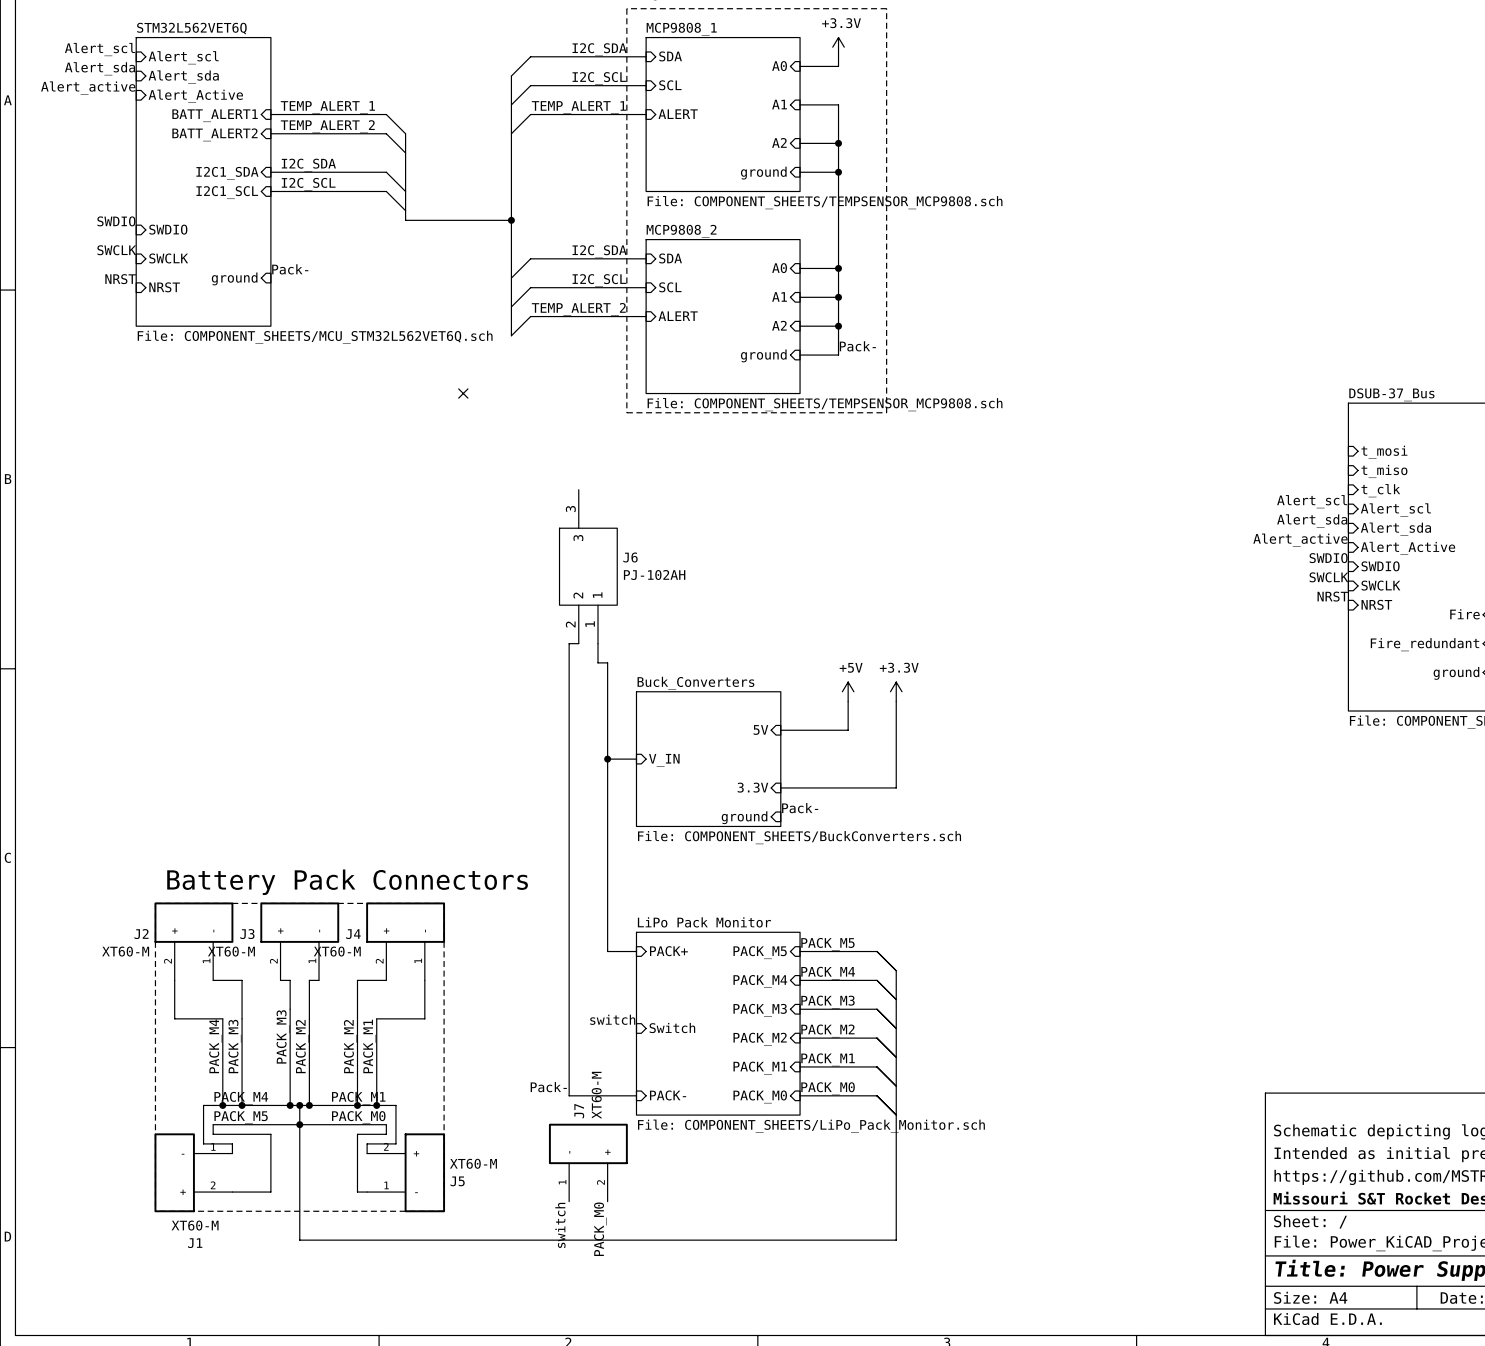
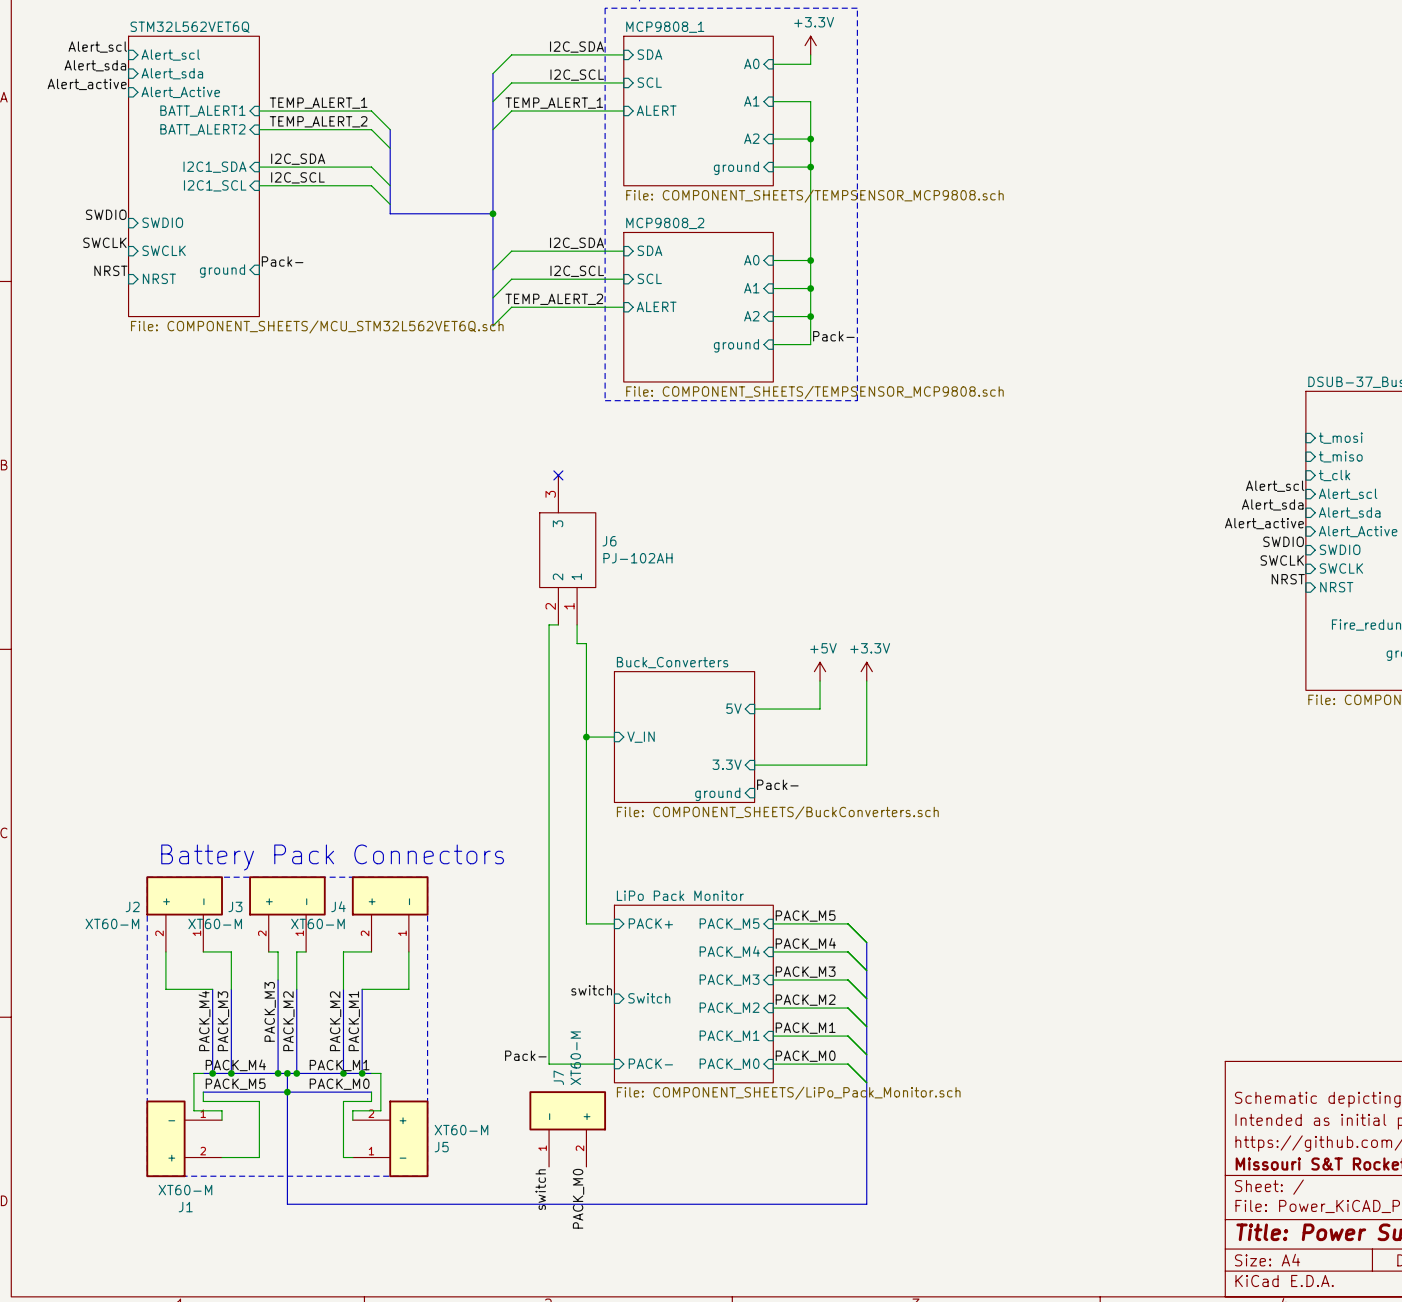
no-connect mark: (463, 393) -> none
no-connect mark: none -> (558, 475)

